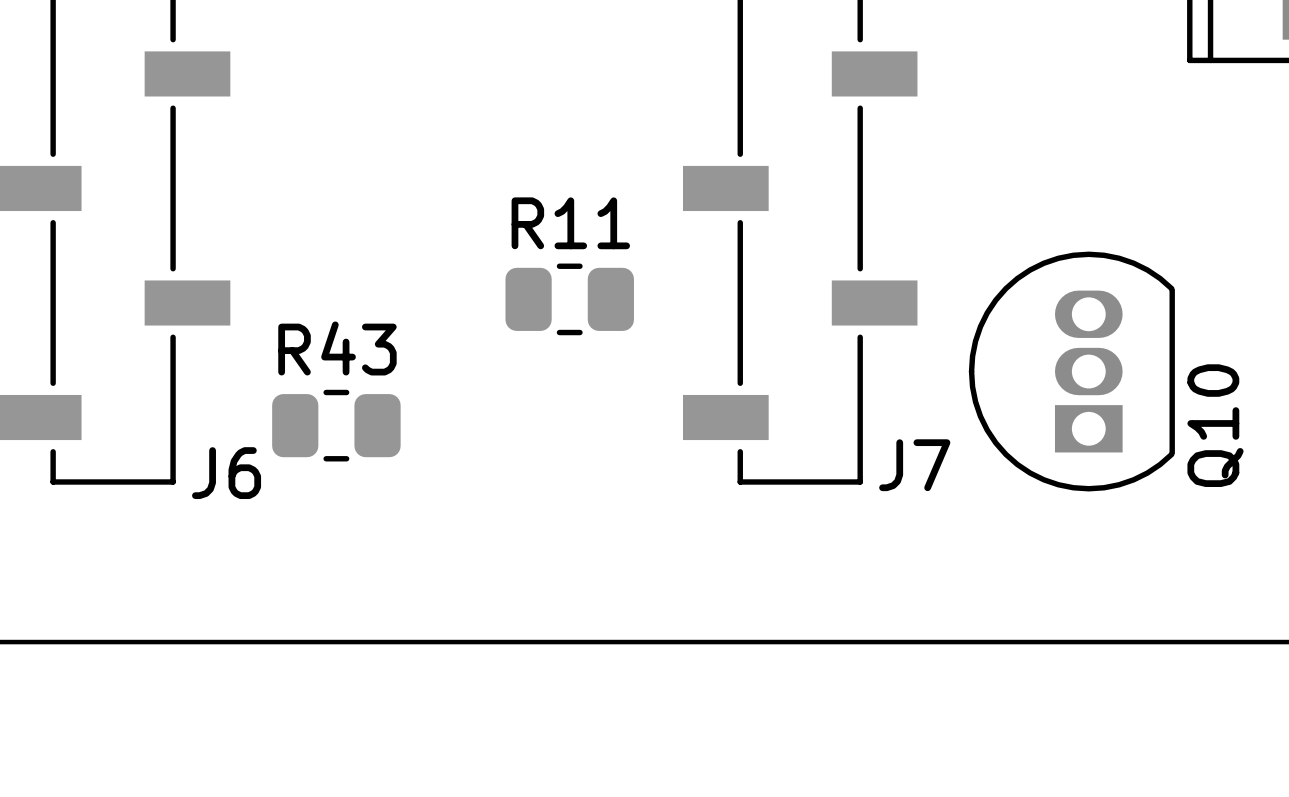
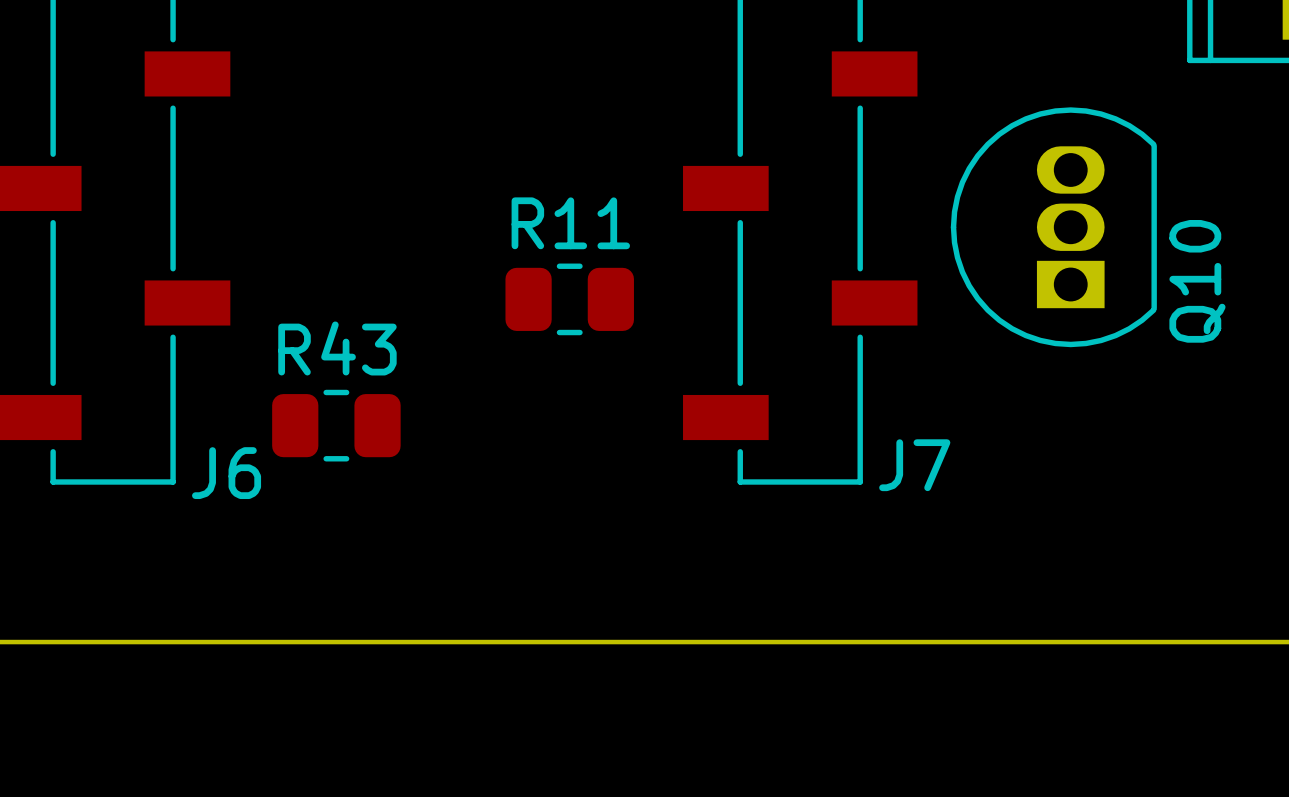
Q10 position: (1071, 371) -> (1053, 227)

